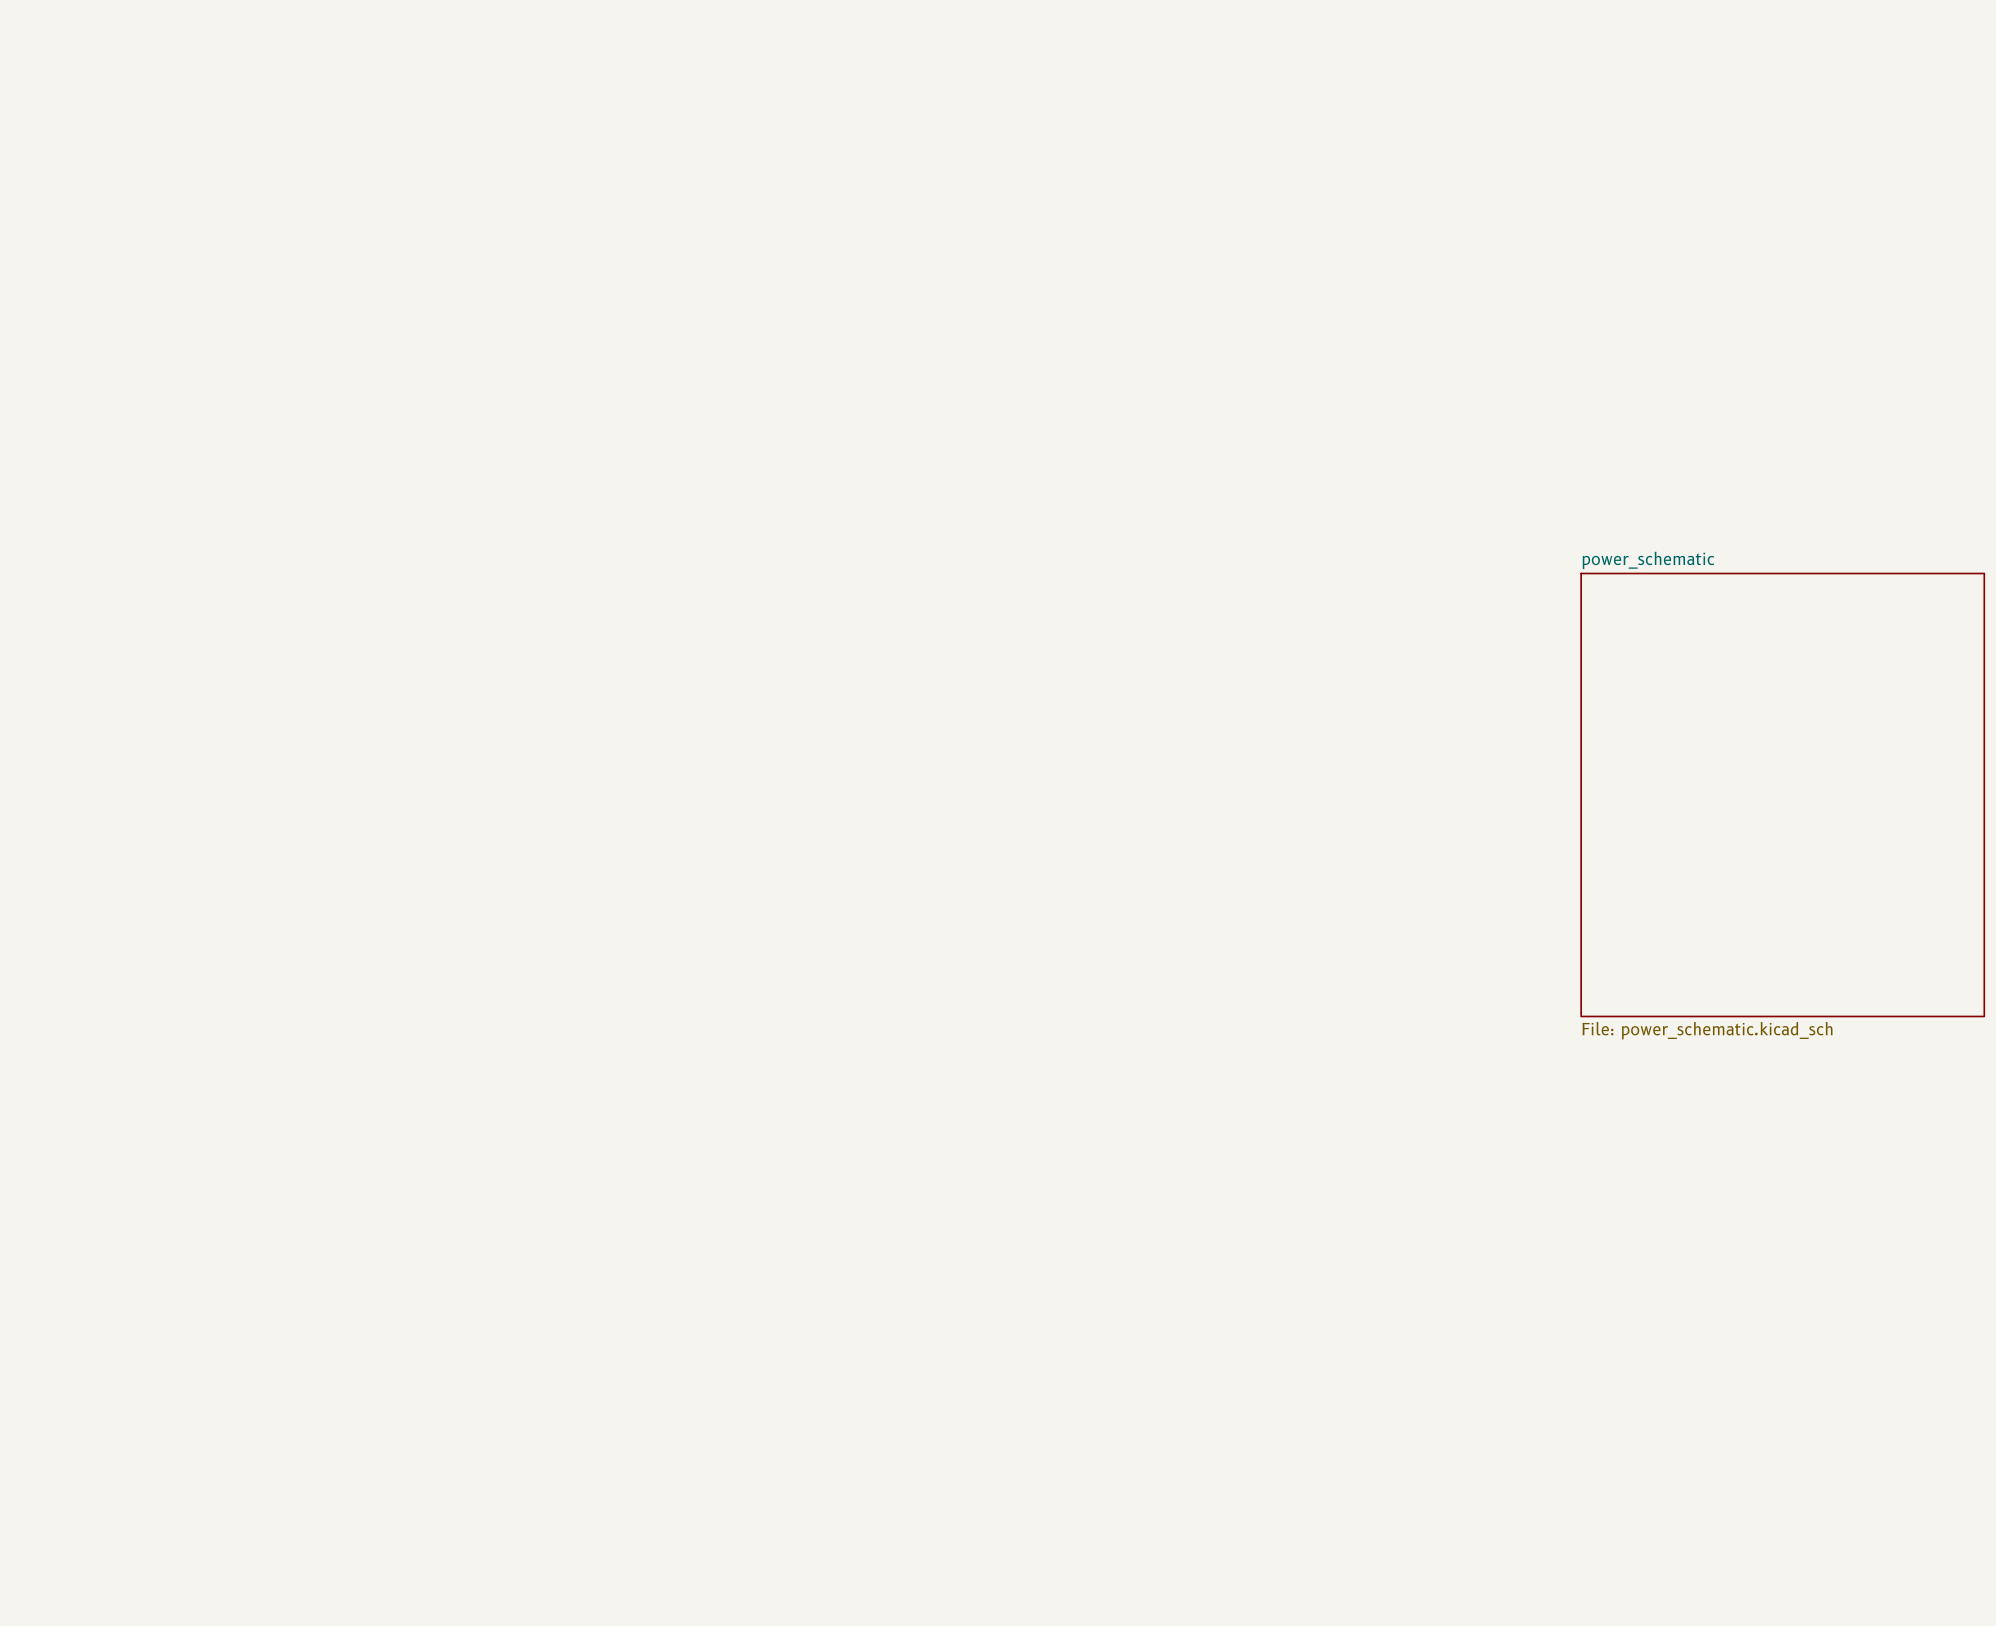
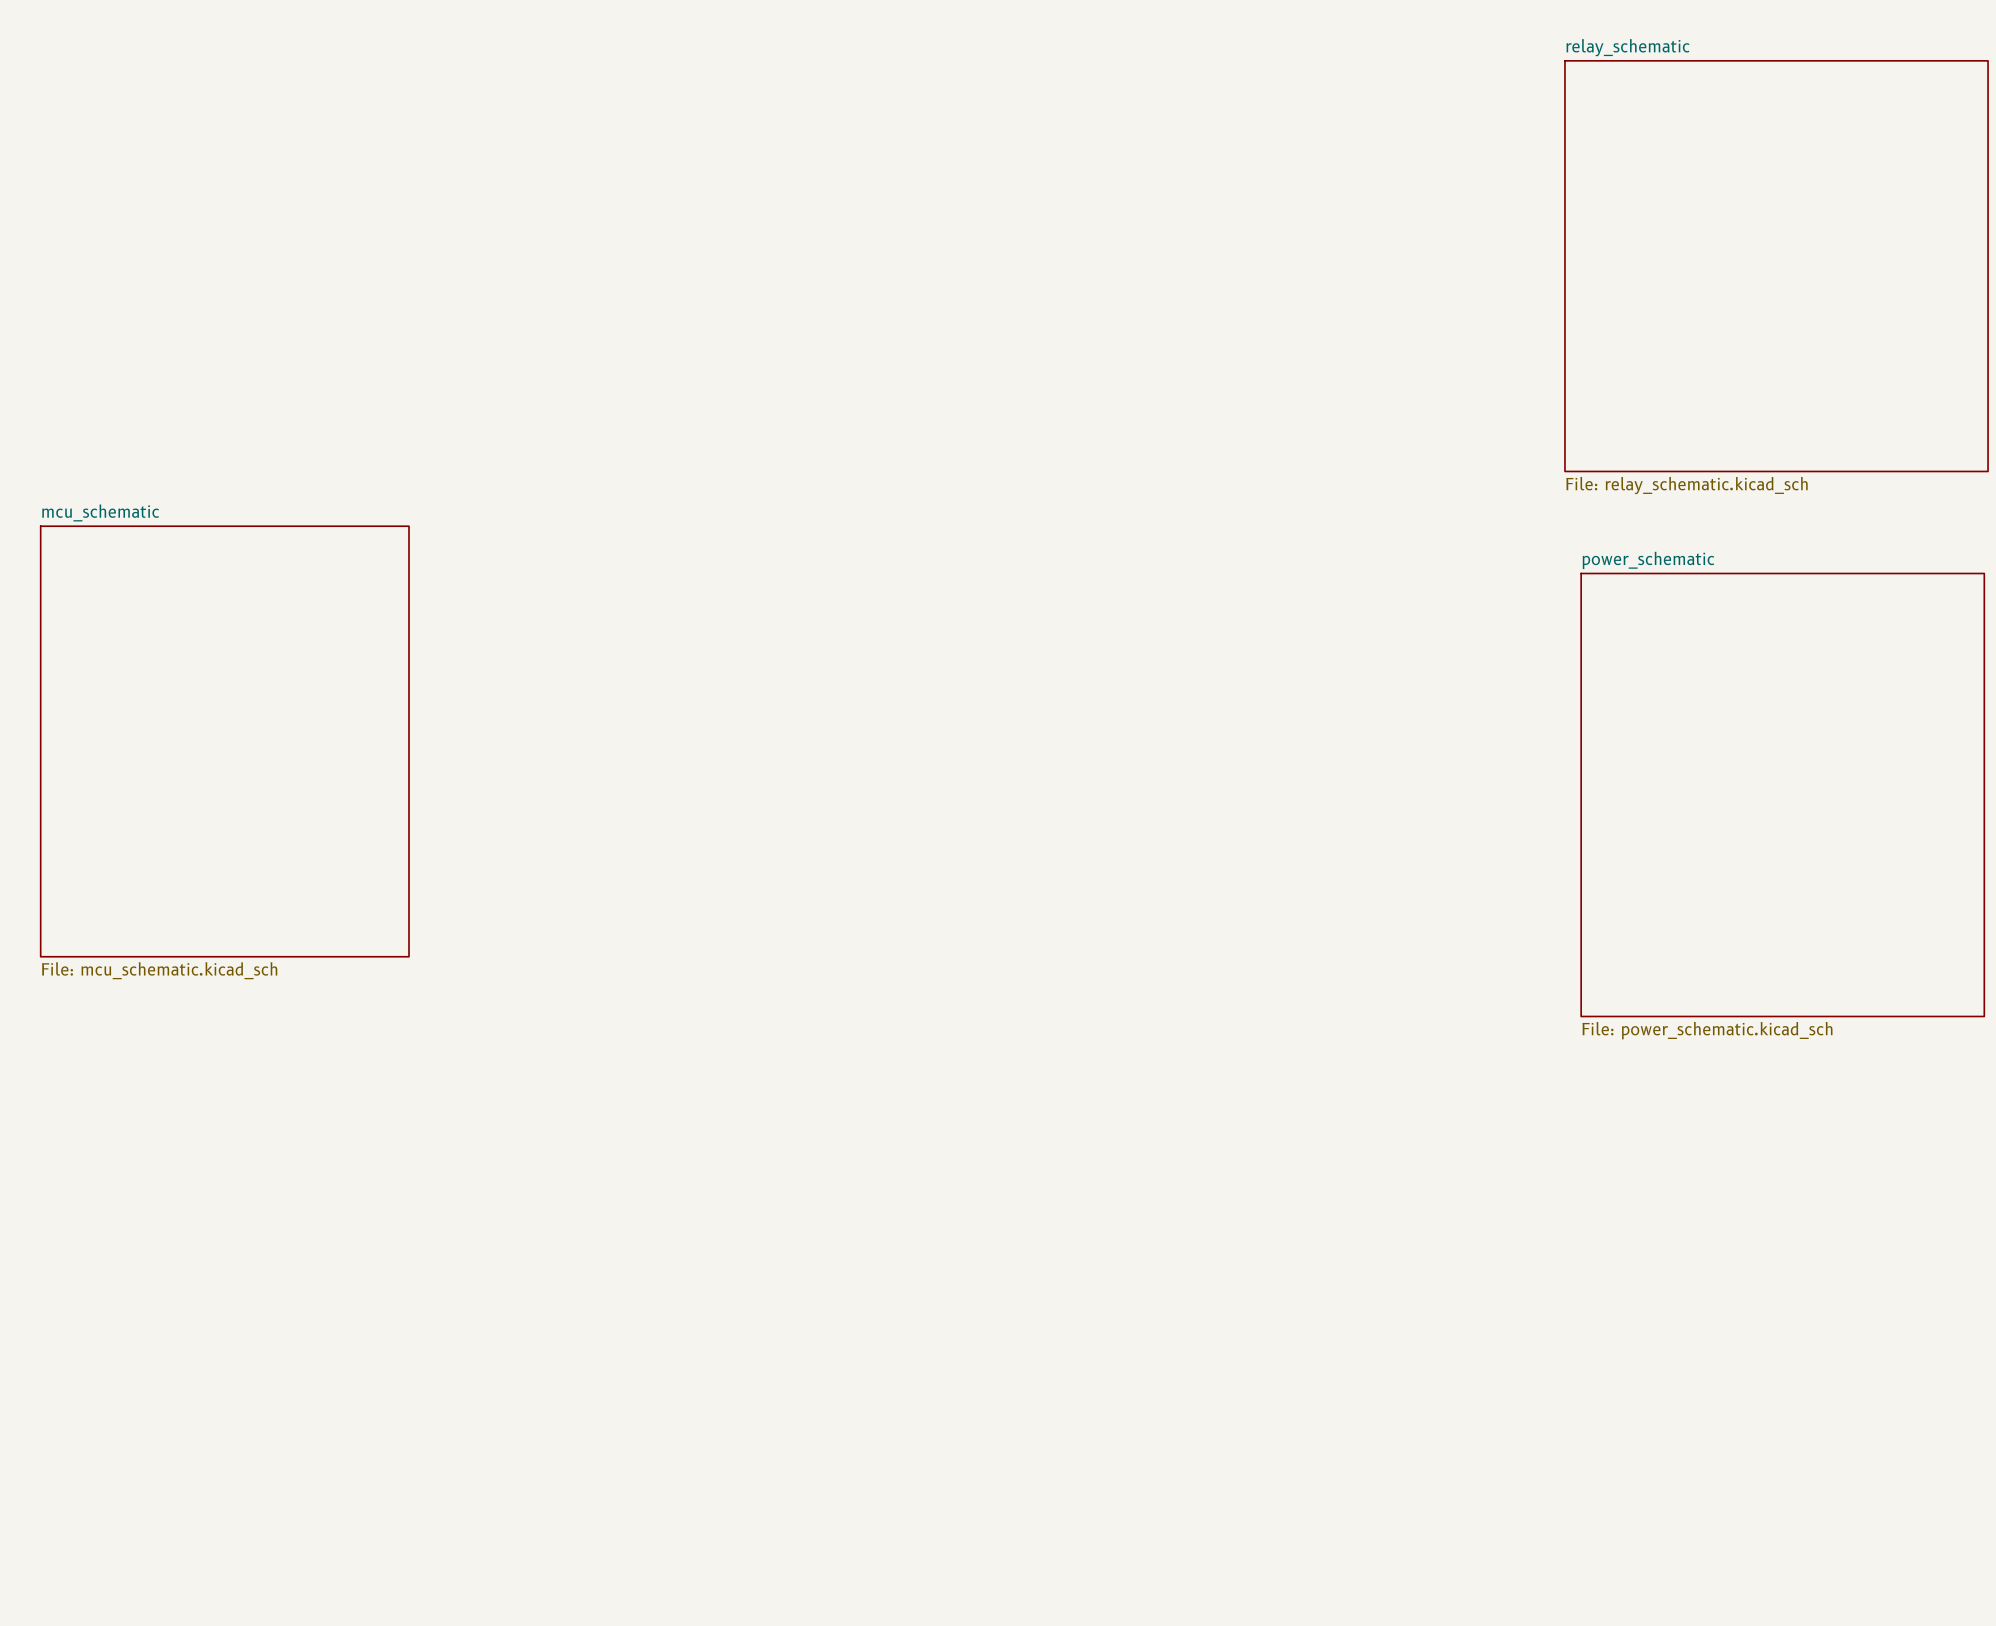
sheet relay_schematic: none -> File: relay_schematic.kicad_sch (1776, 266)
sheet mcu_schematic: none -> File: mcu_schematic.kicad_sch (224, 741)

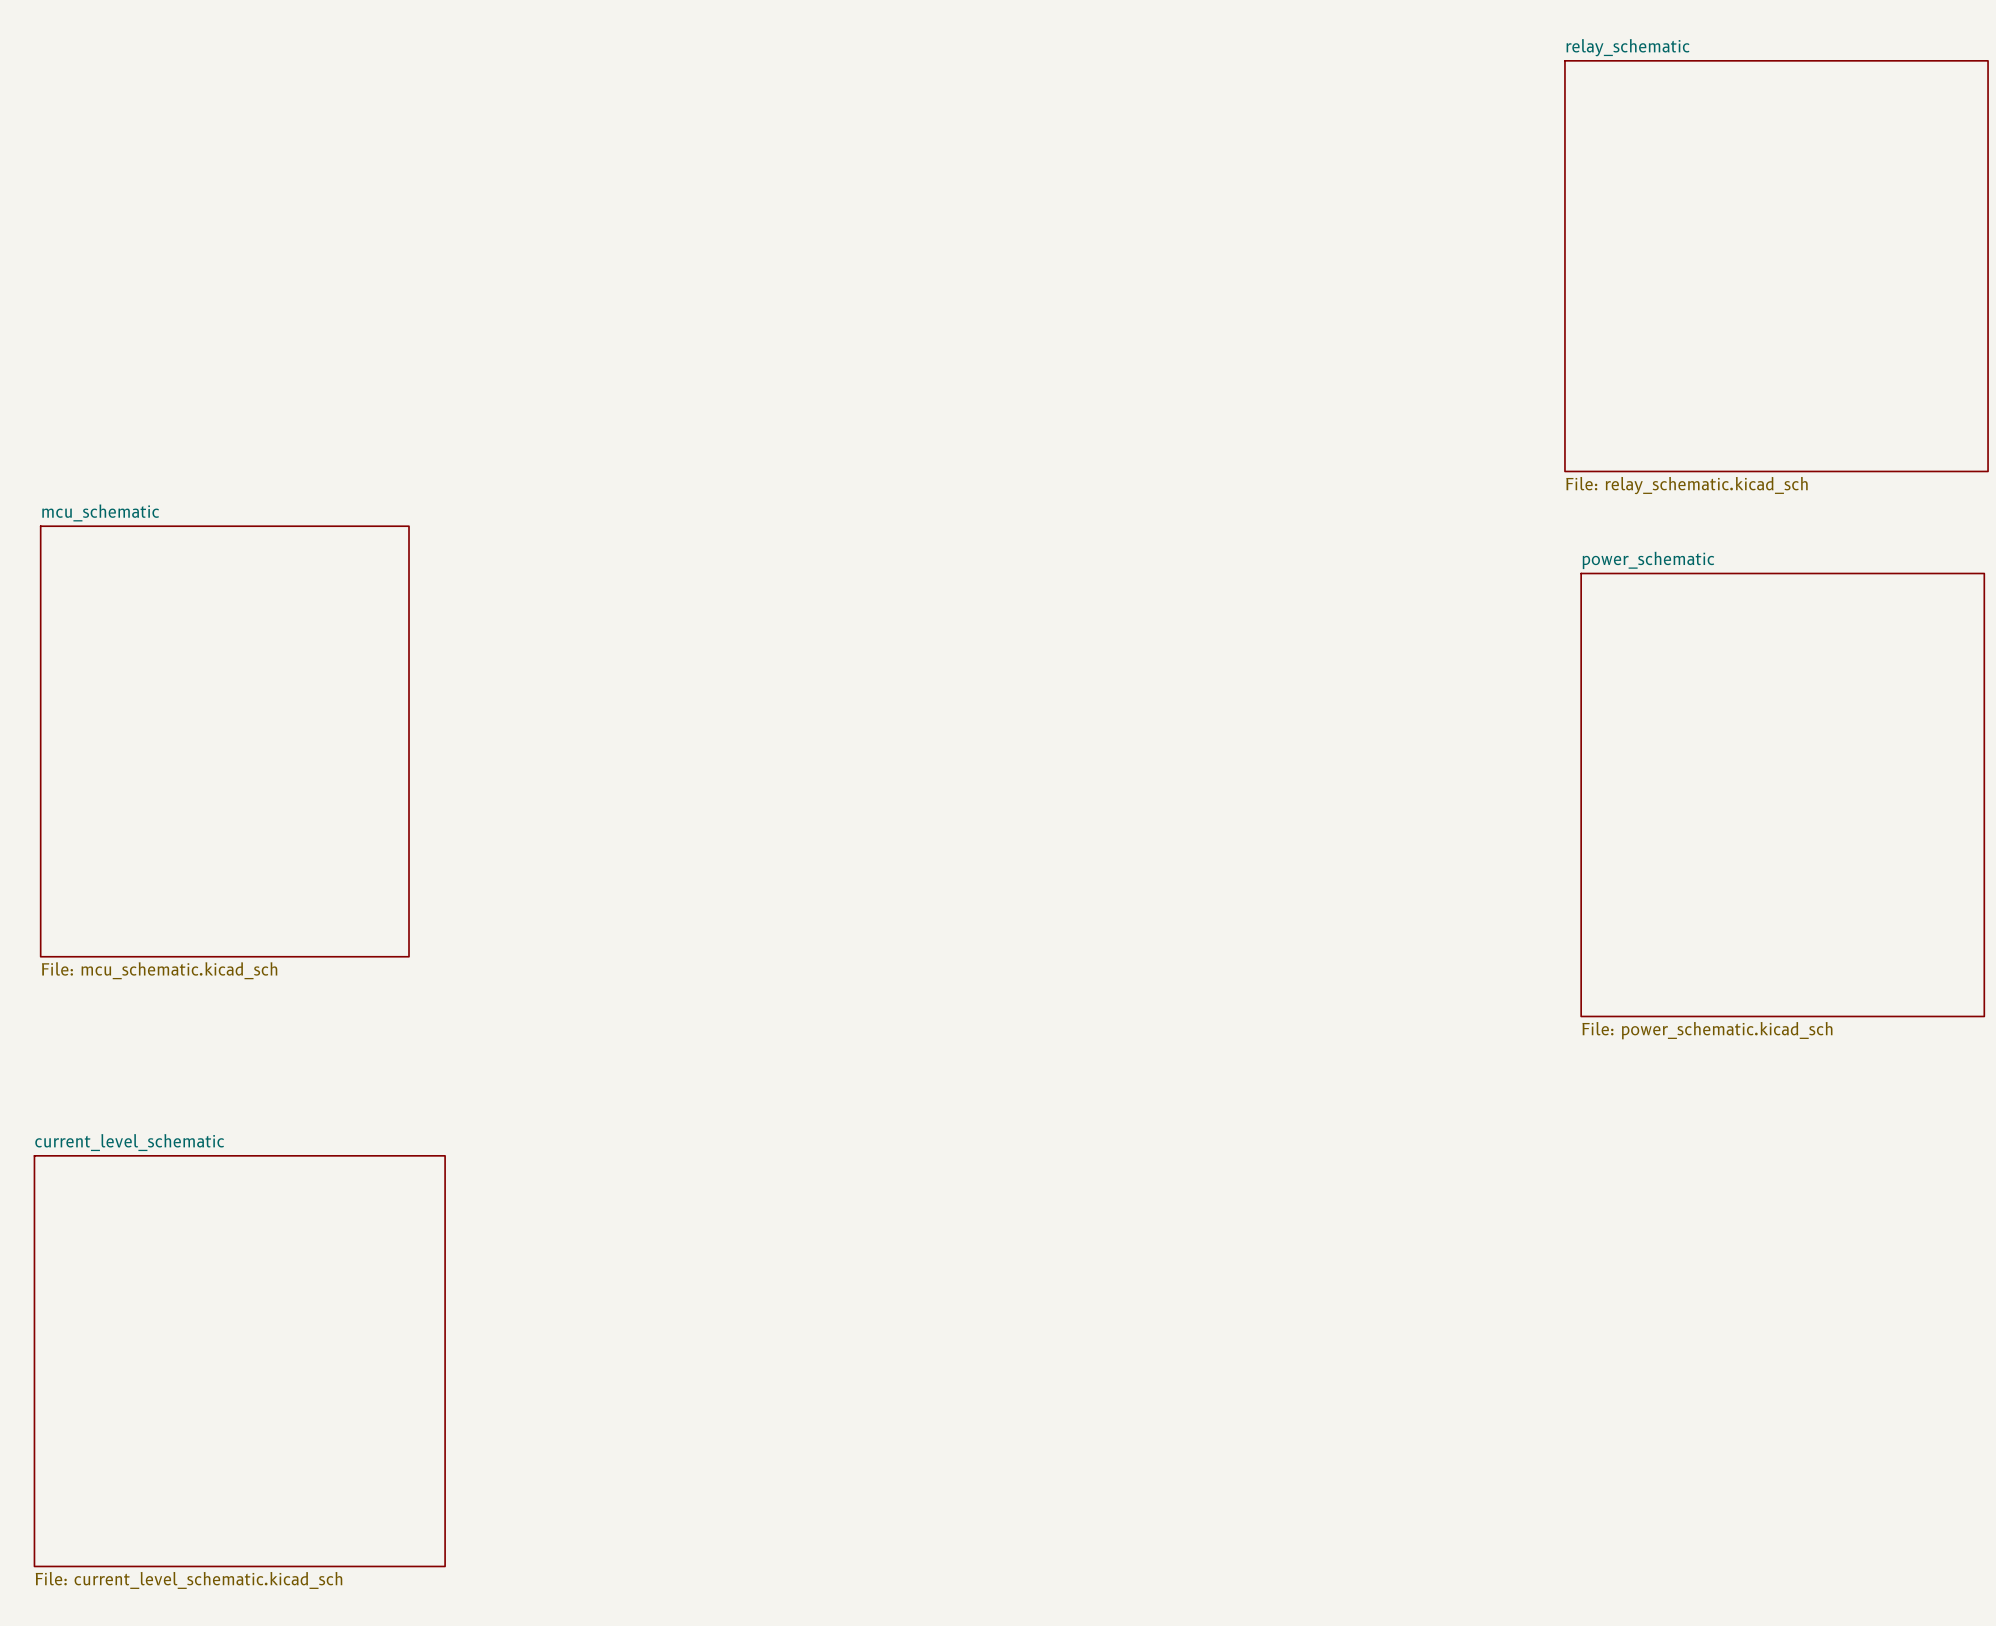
sheet current_level_schematic: none -> File: current_level_schematic.kicad_sch (239, 1361)

